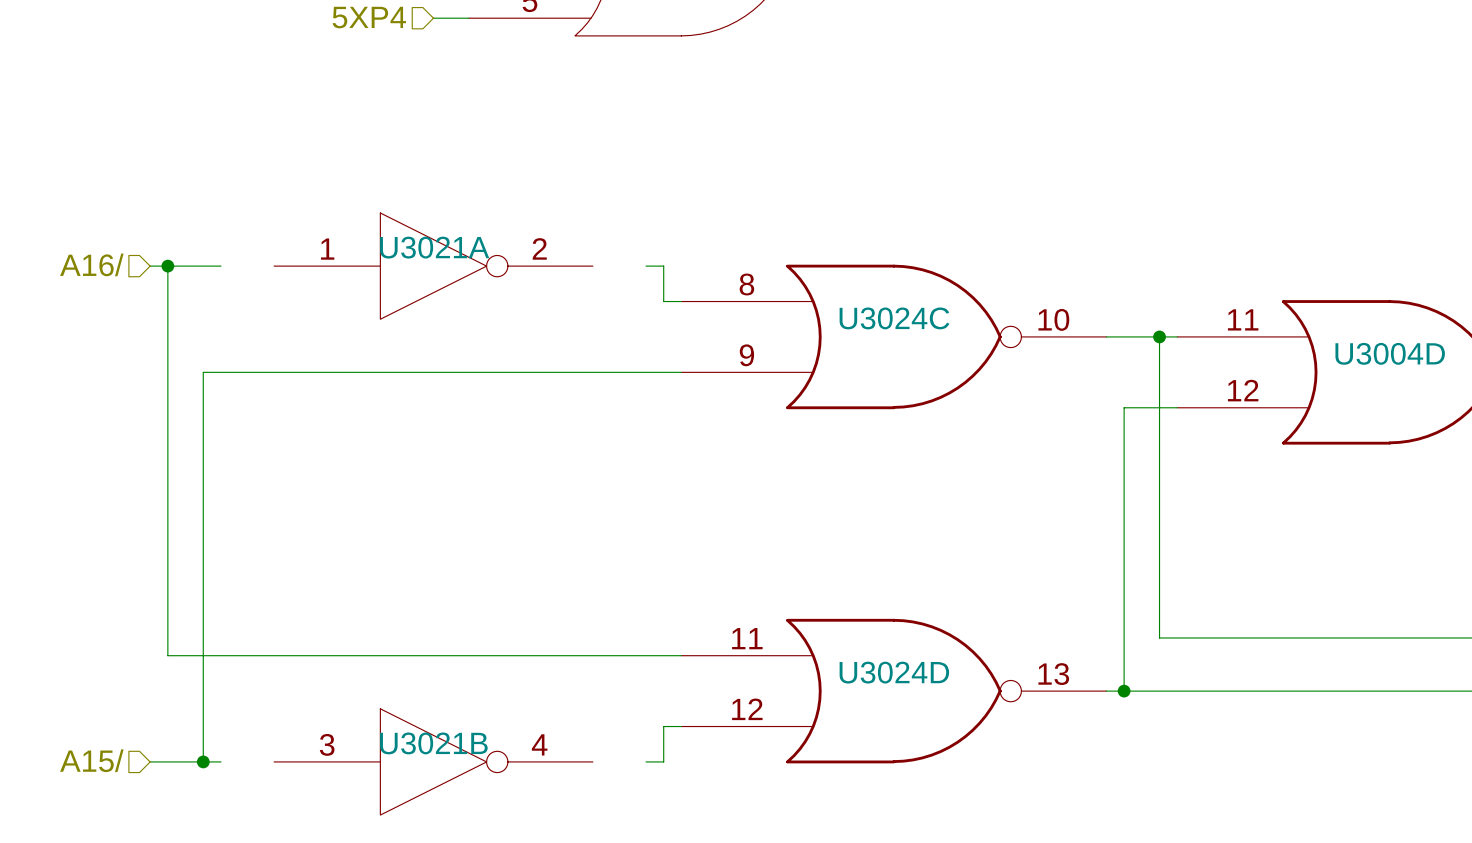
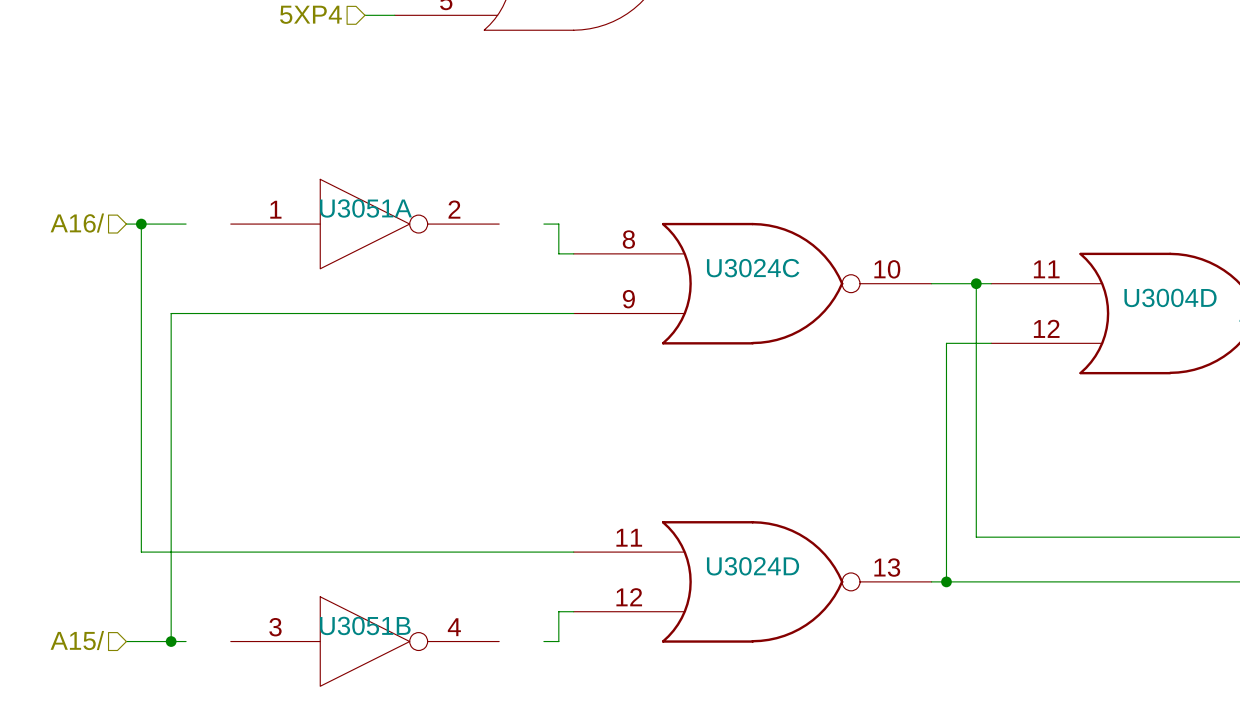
U3021A name: U3021A (434, 247) -> U3051A (365, 208)
U3021B name: U3021B (433, 743) -> U3051B (365, 625)

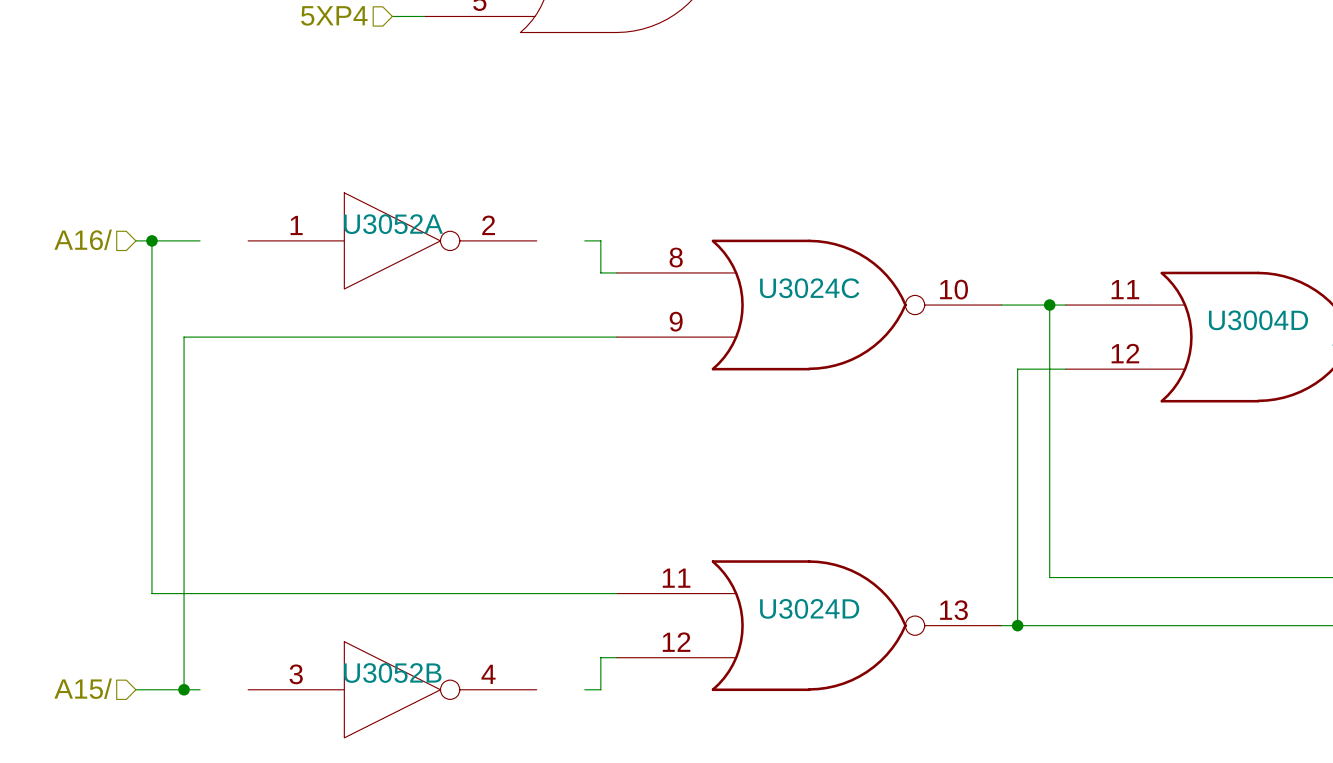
U3051A name: U3051A (365, 208) -> U3052A (393, 224)
U3051B name: U3051B (365, 625) -> U3052B (392, 673)

